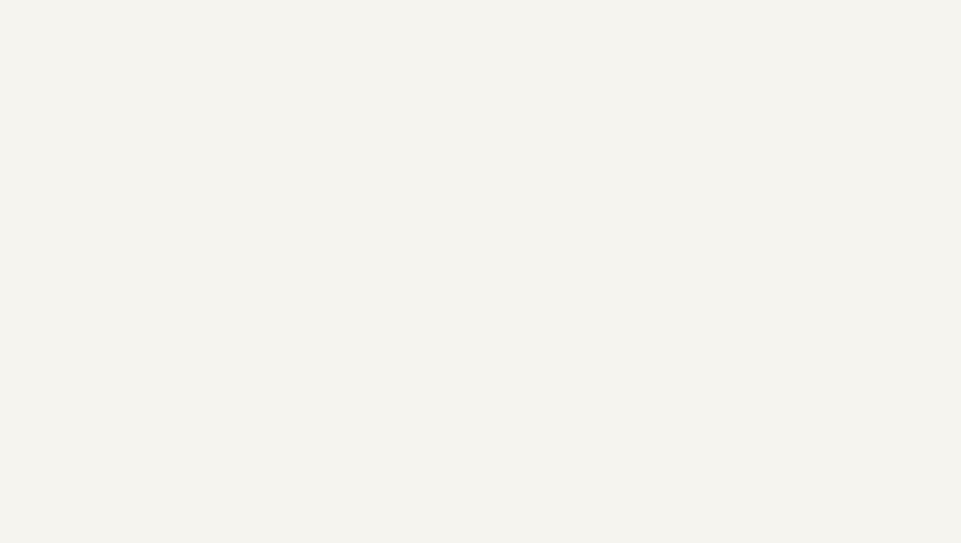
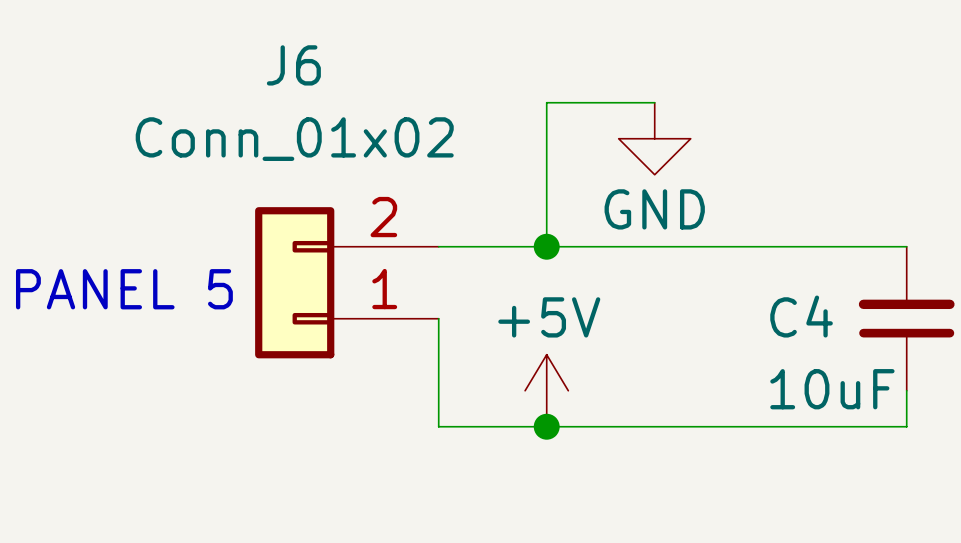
wire: none -> (654, 102) (546, 102) (546, 246)
power symbol: none -> GND (654, 138)
wire: none -> (438, 246) (906, 246)
junction: none -> (546, 246)
J6: none -> Conn_01x02 (346, 282)
text: none -> PANEL 5 (124, 289)
wire: none -> (438, 318) (438, 426) (906, 426) (906, 390)
C4: none -> 10uF (906, 318)
power symbol: none -> +5V (546, 390)
junction: none -> (546, 426)

